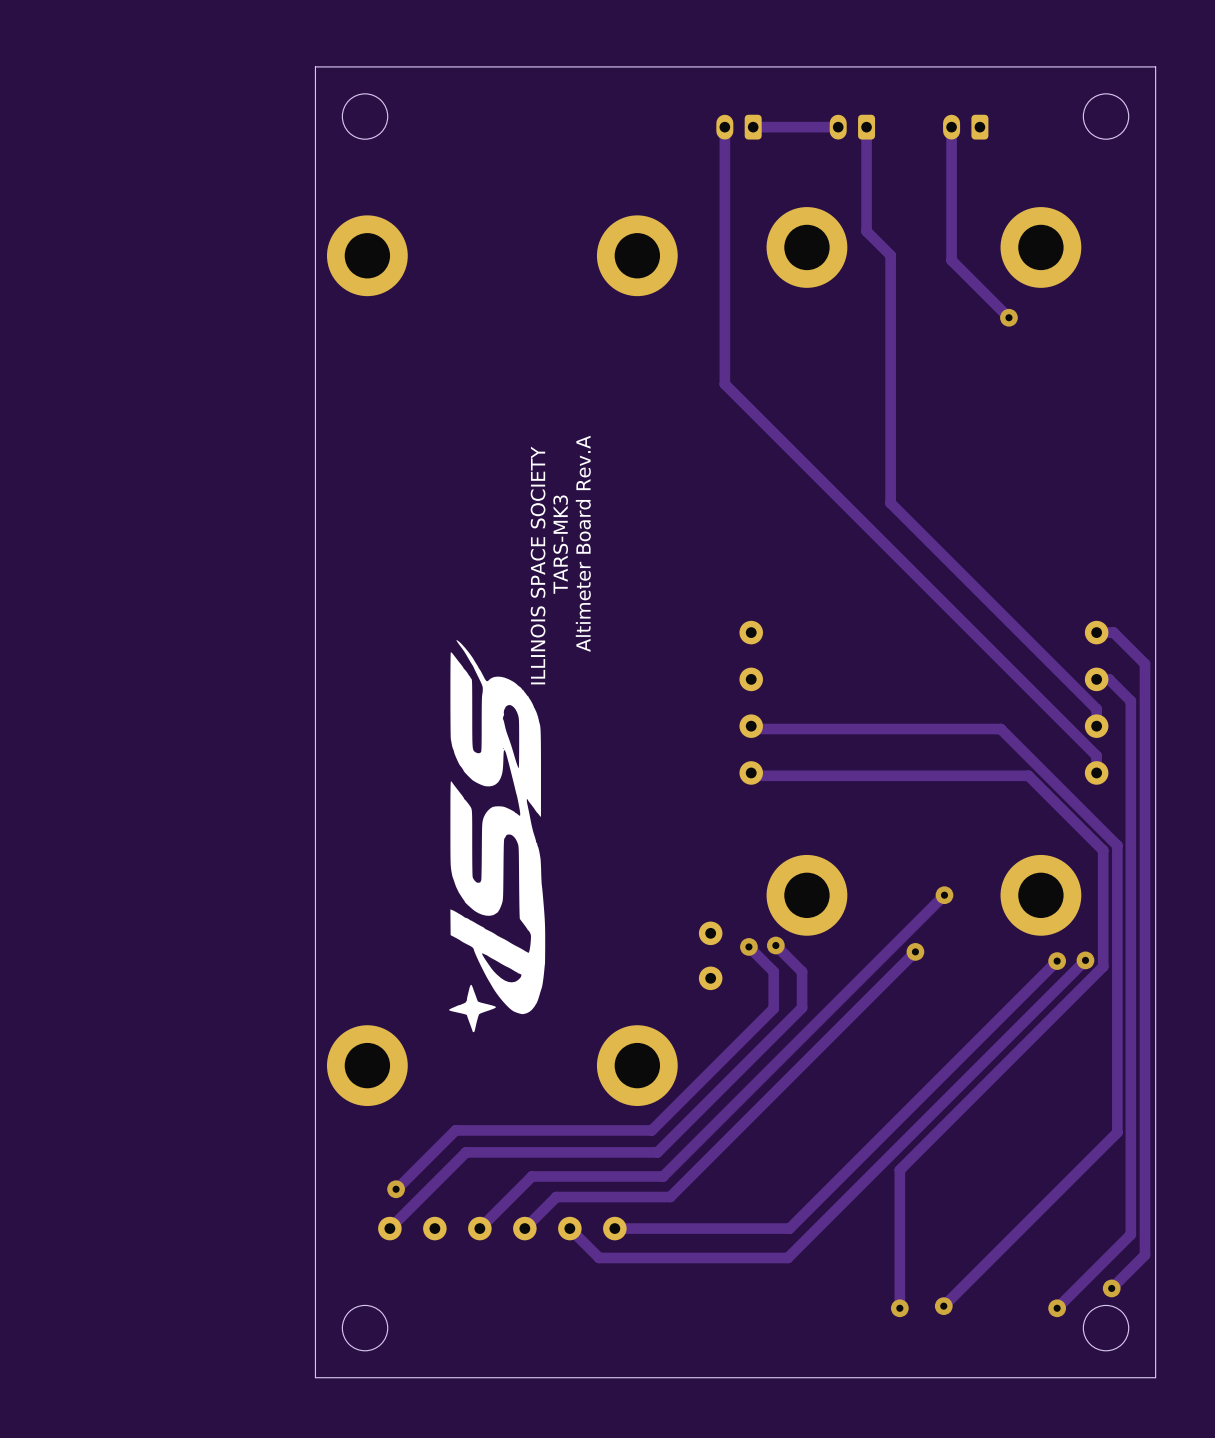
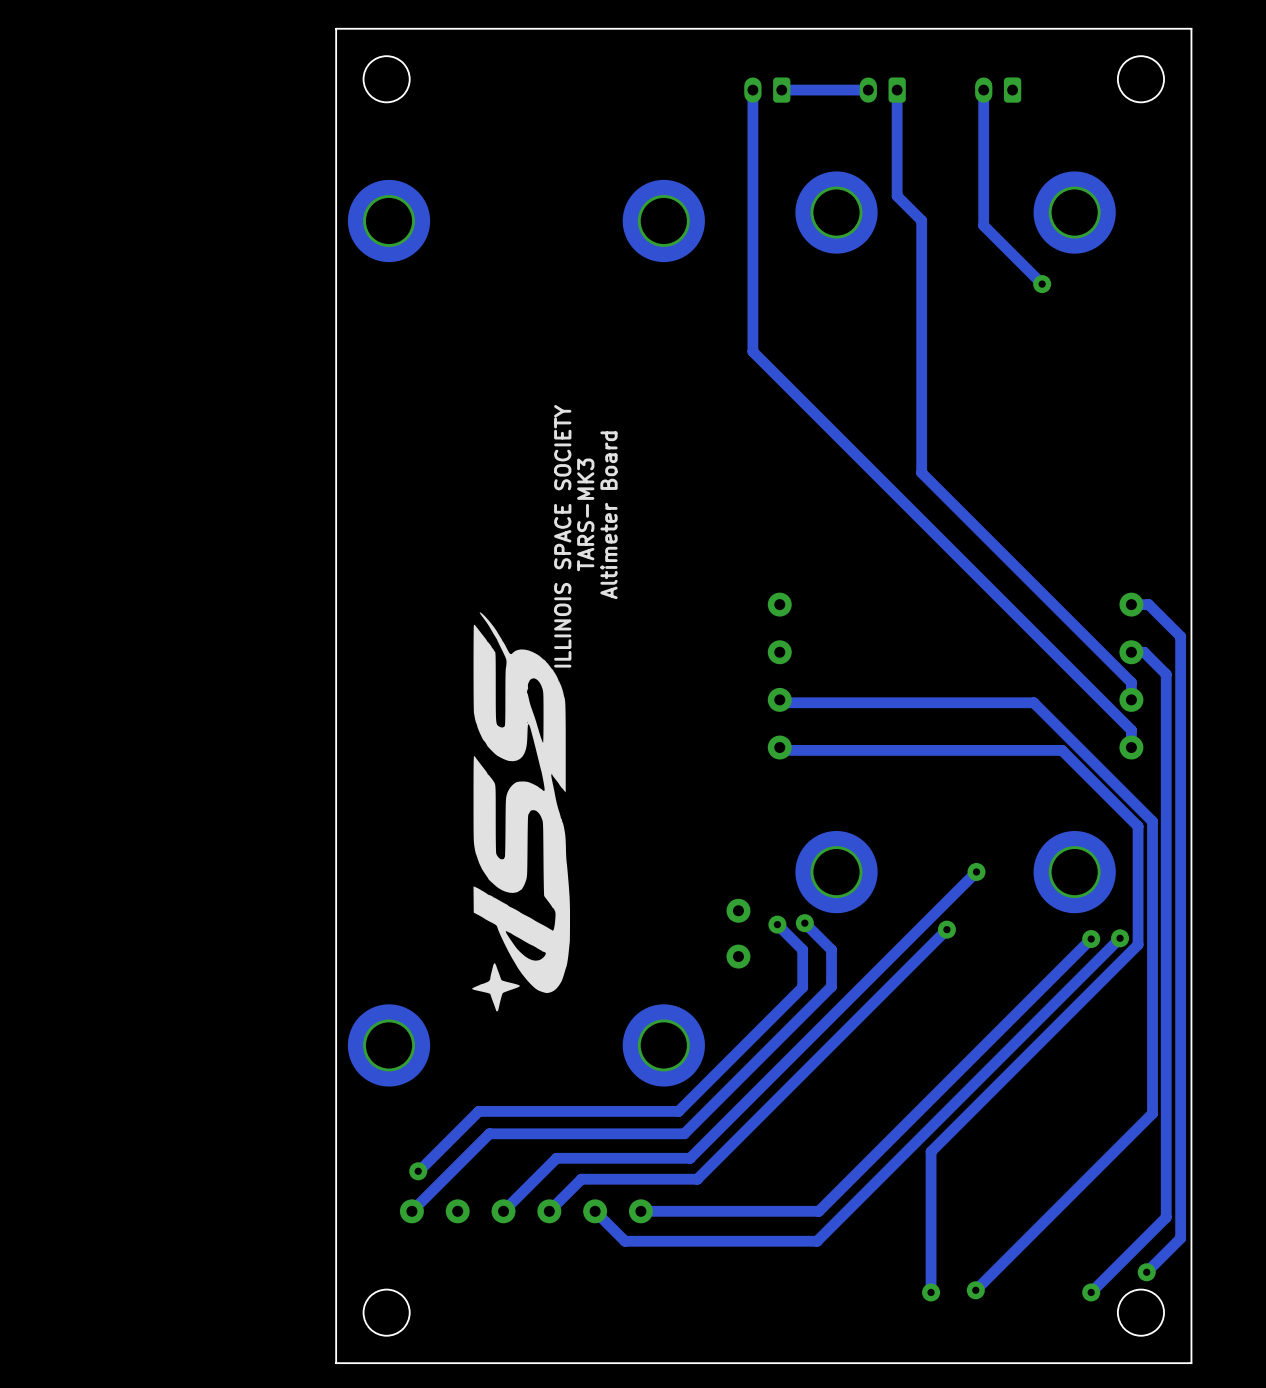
text: Altimeter Board Rev.A (583, 543) -> Altimeter Board (608, 515)

